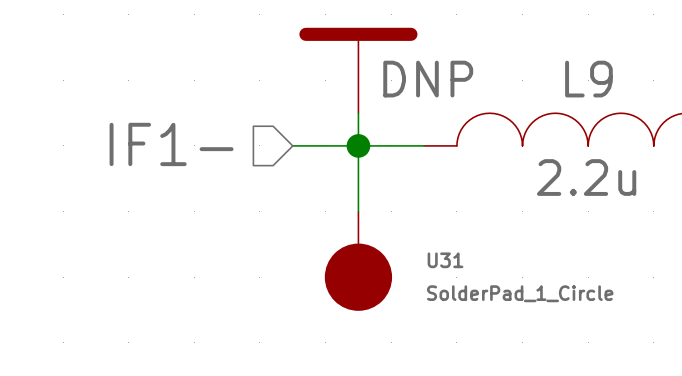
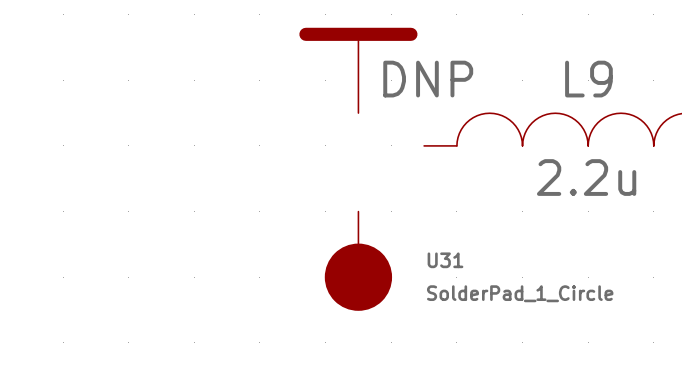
wire: (358, 113) (358, 211) -> none
hierarchical label: IF1- (171, 144) -> none
wire: (292, 145) (424, 145) -> none
junction: (358, 145) -> none

